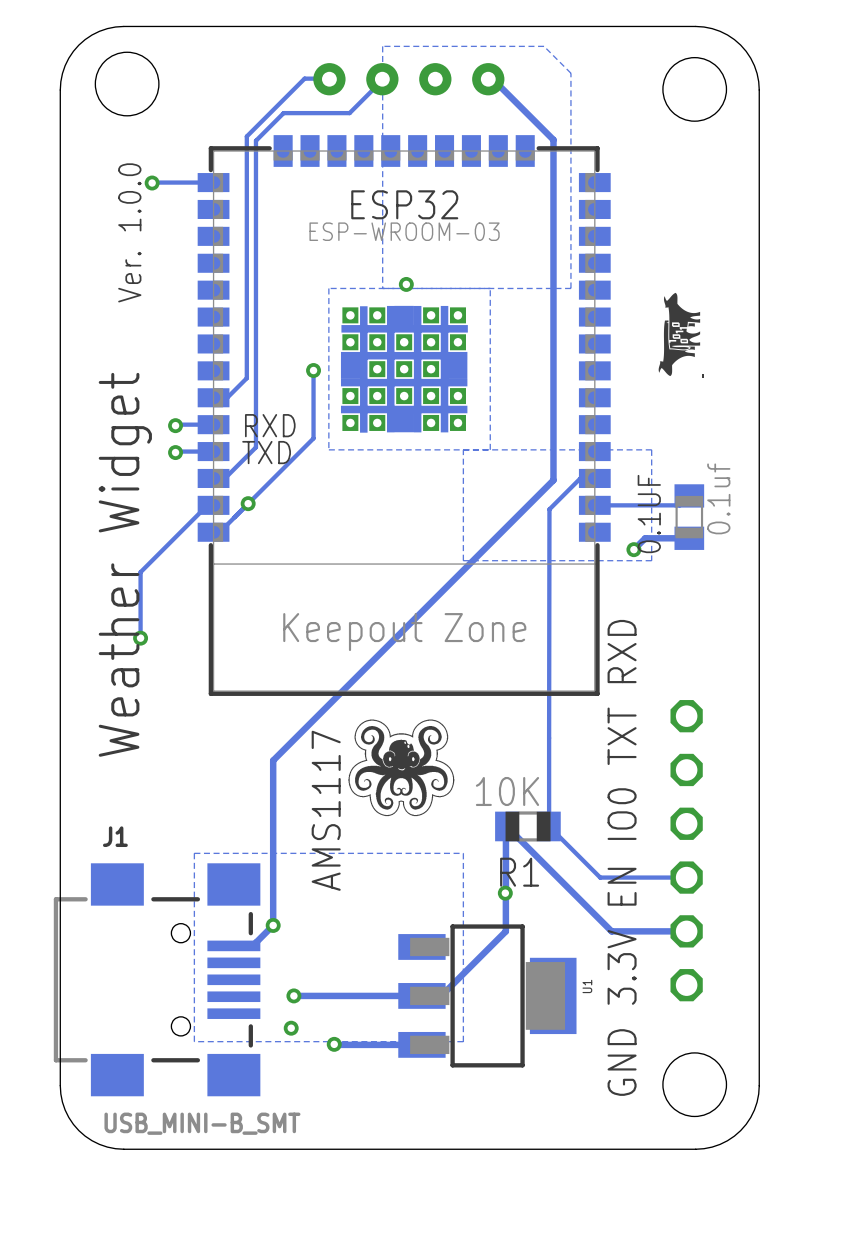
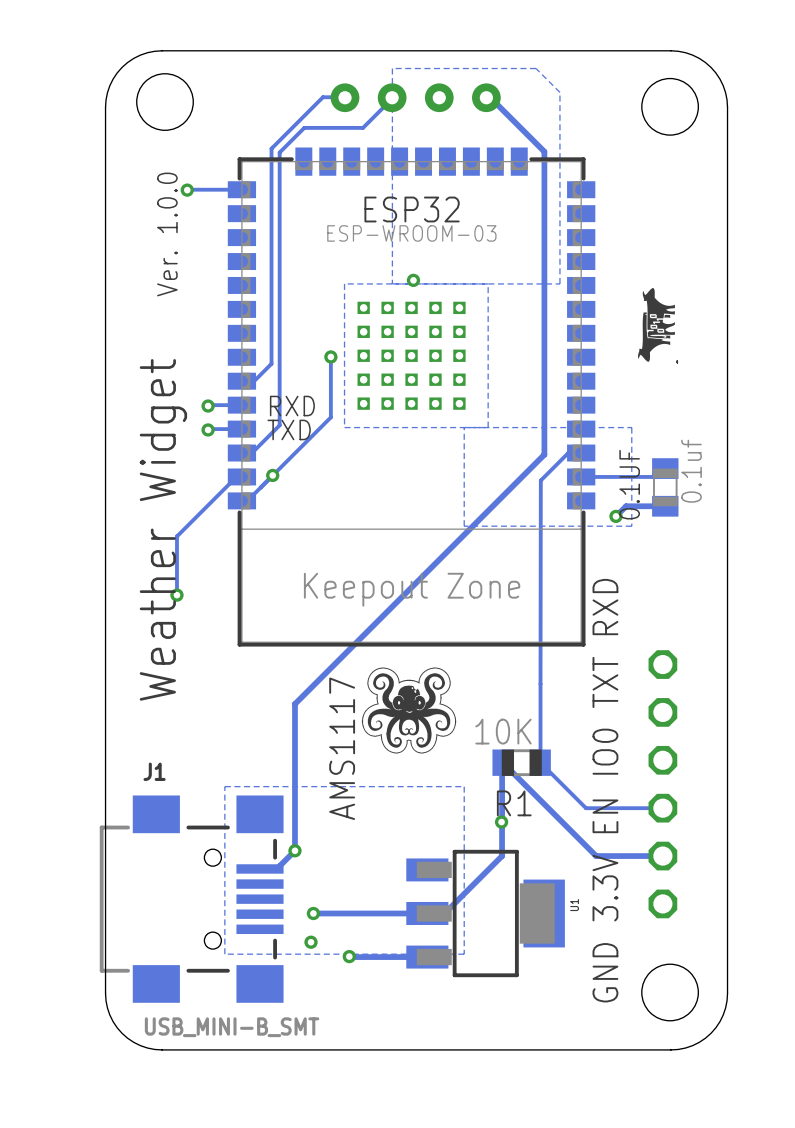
ESP32 footprint: [197, 135, 611, 696] -> [227, 147, 596, 647]

